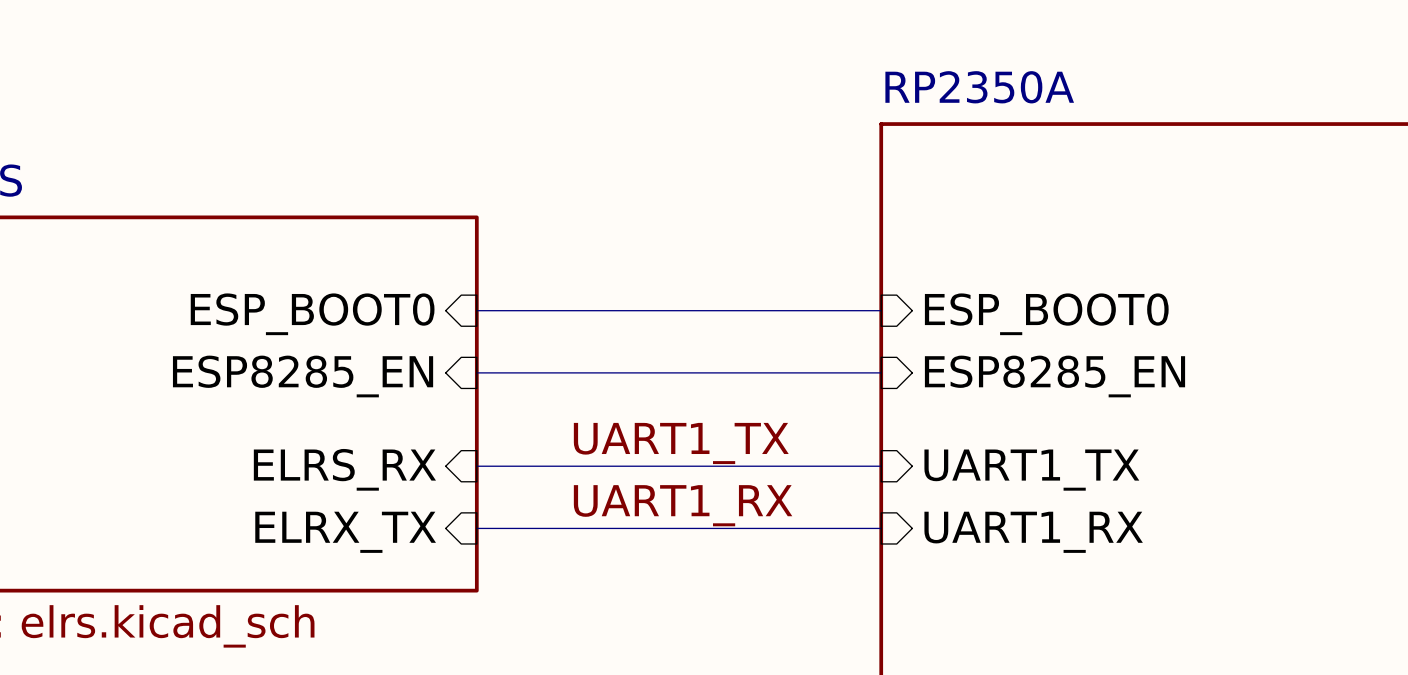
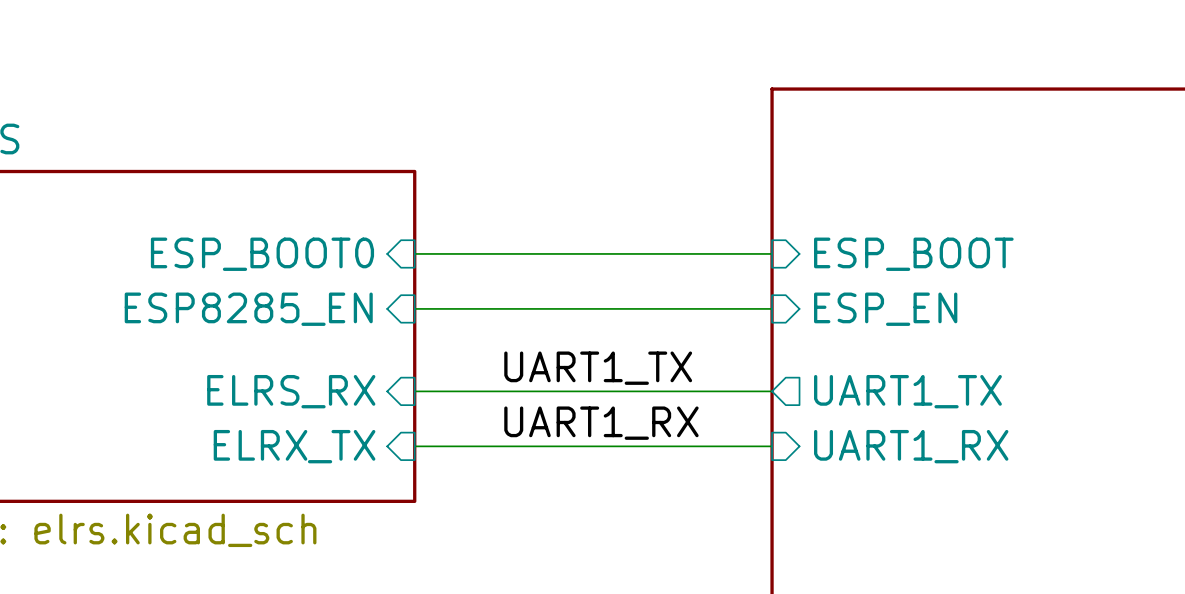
sheet RP2350A name: RP2350A (979, 87) -> none
sheet pin: ESP_BOOT0 (1046, 314) -> ESP_BOOT (913, 254)
sheet pin: ESP8285_EN (1055, 376) -> ESP_EN (885, 309)
sheet pin shape: input (1031, 470) -> output (907, 391)

